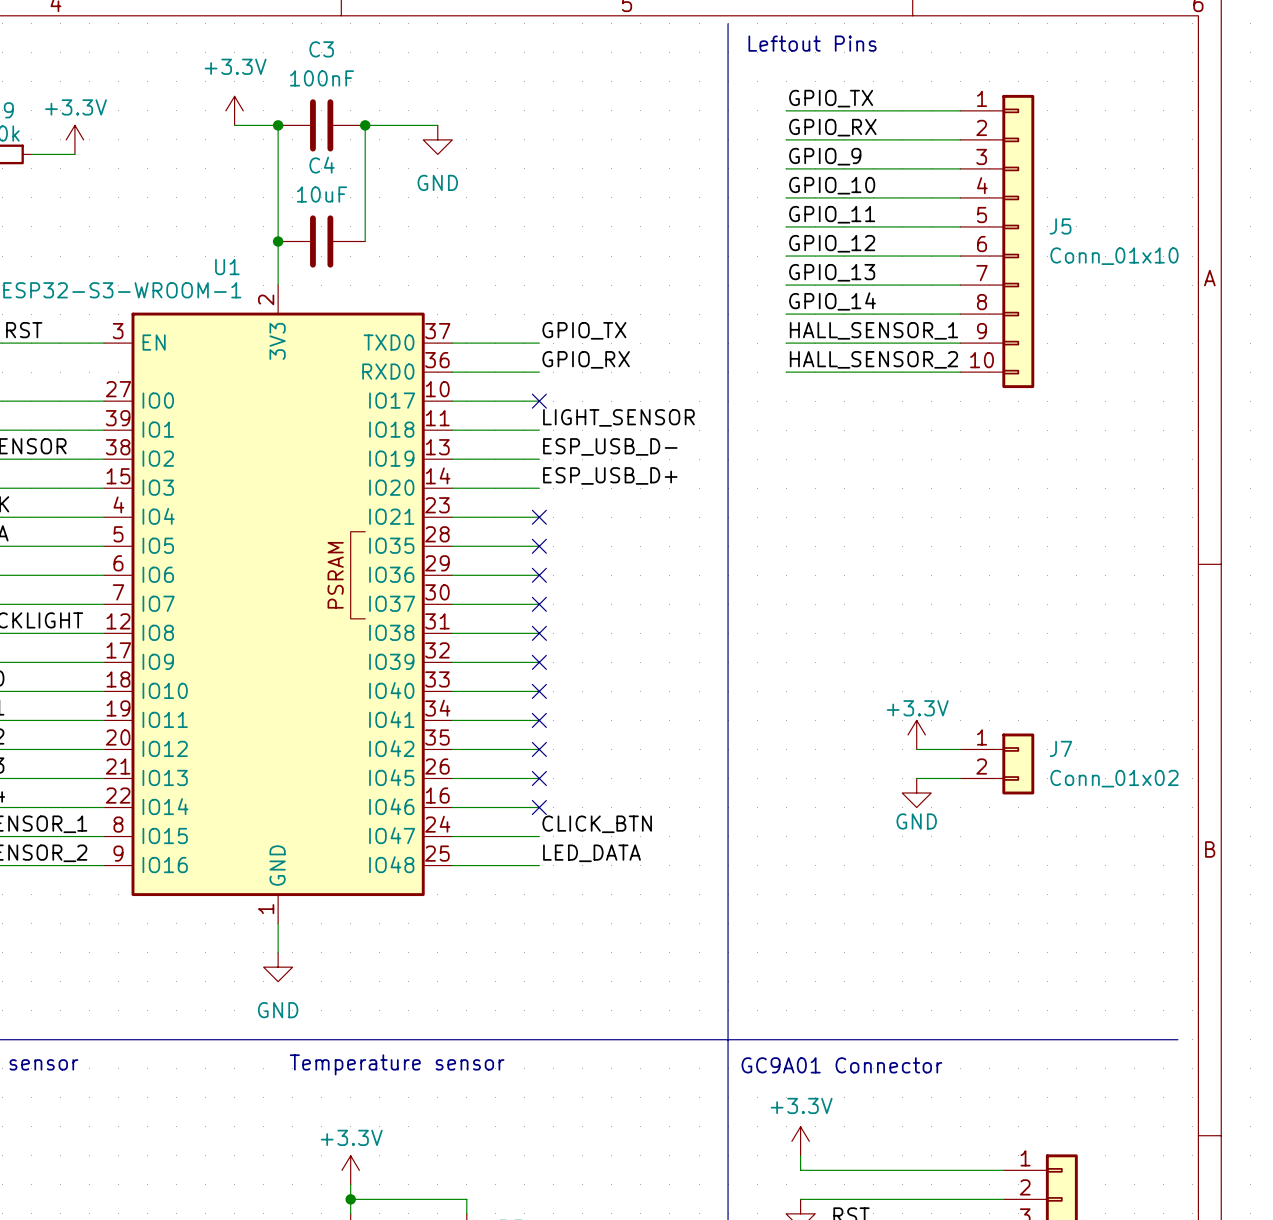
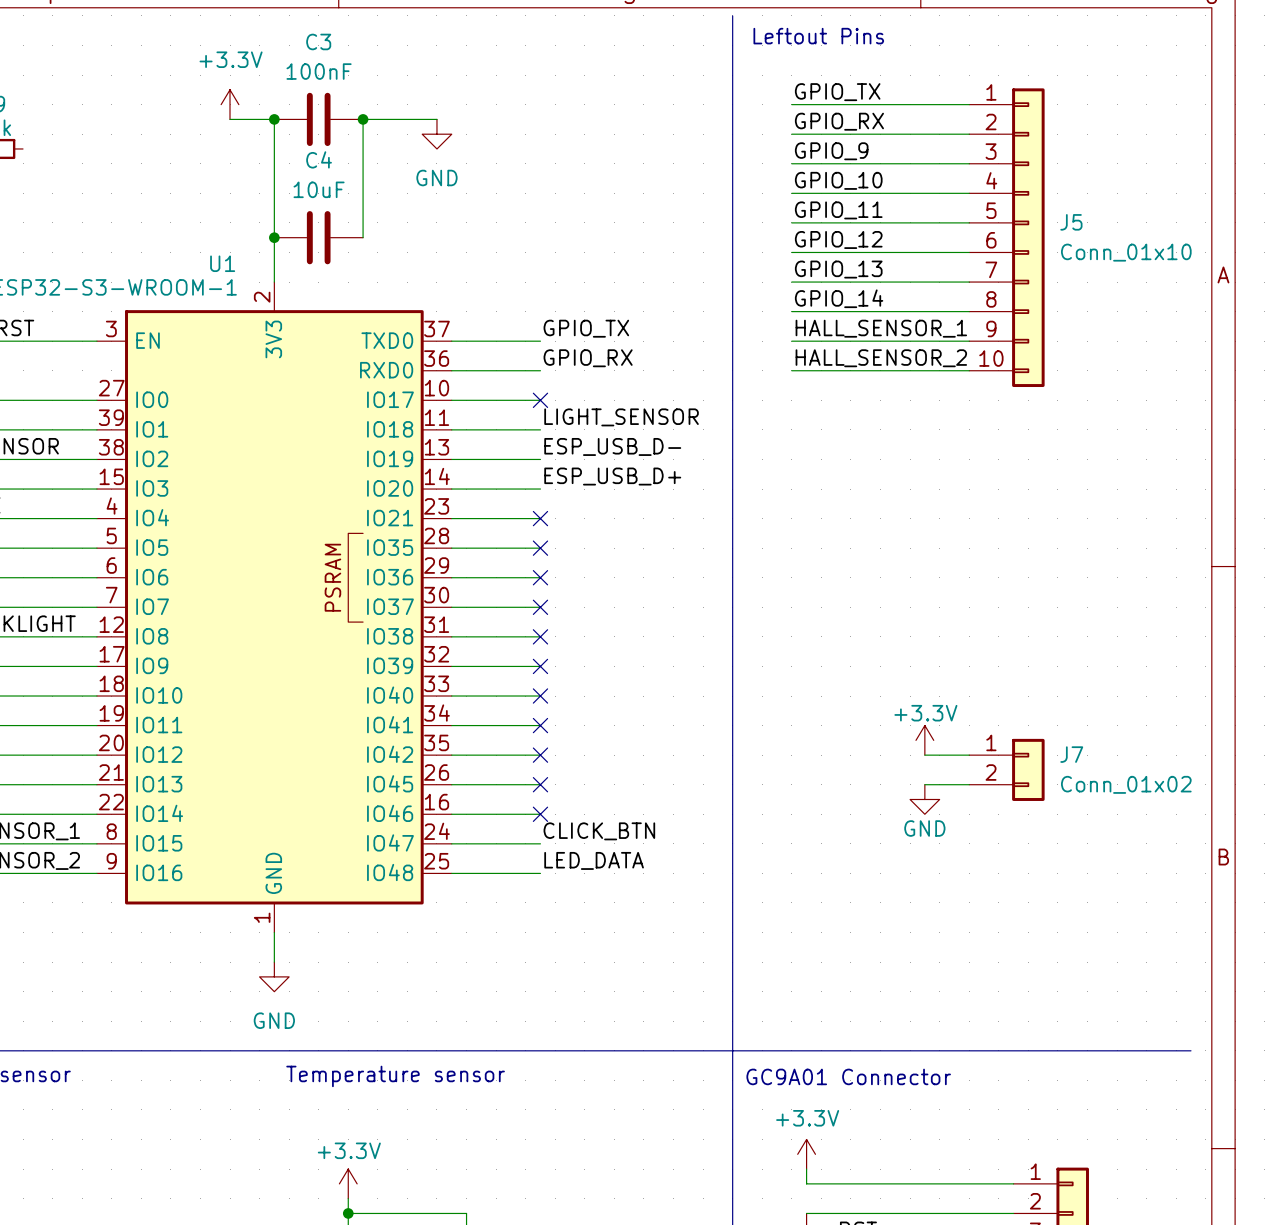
power symbol: +3.3V (74, 139) -> none
wire: (31, 154) (74, 154) -> none

